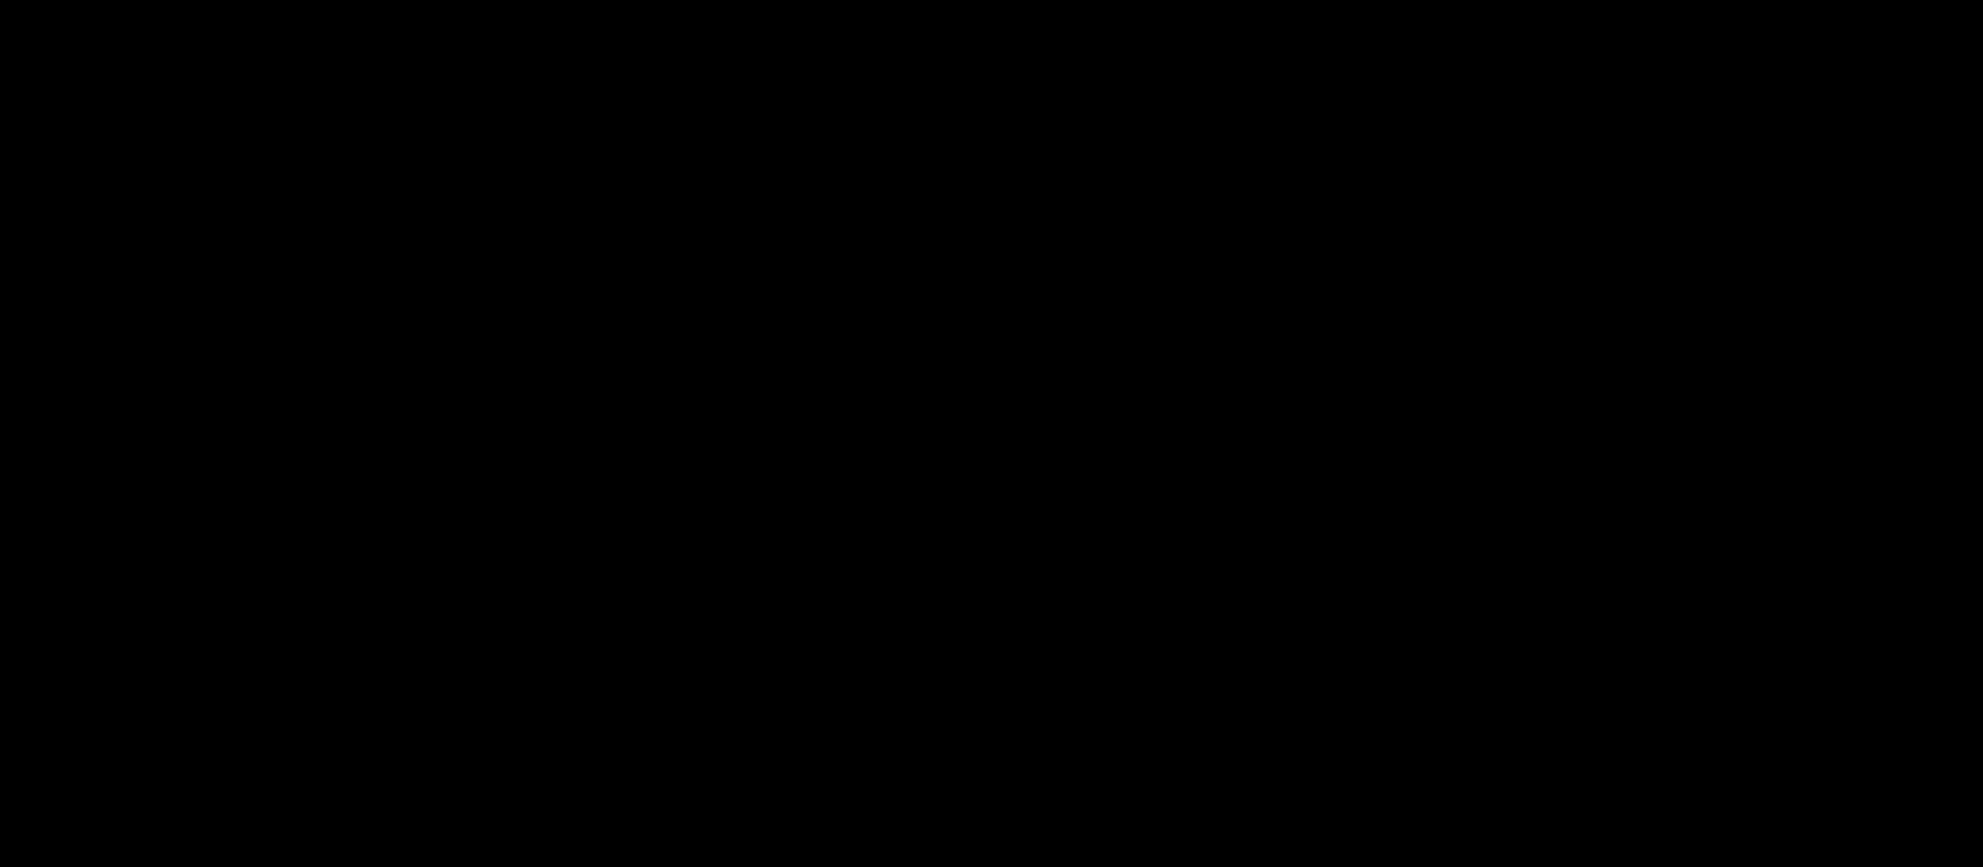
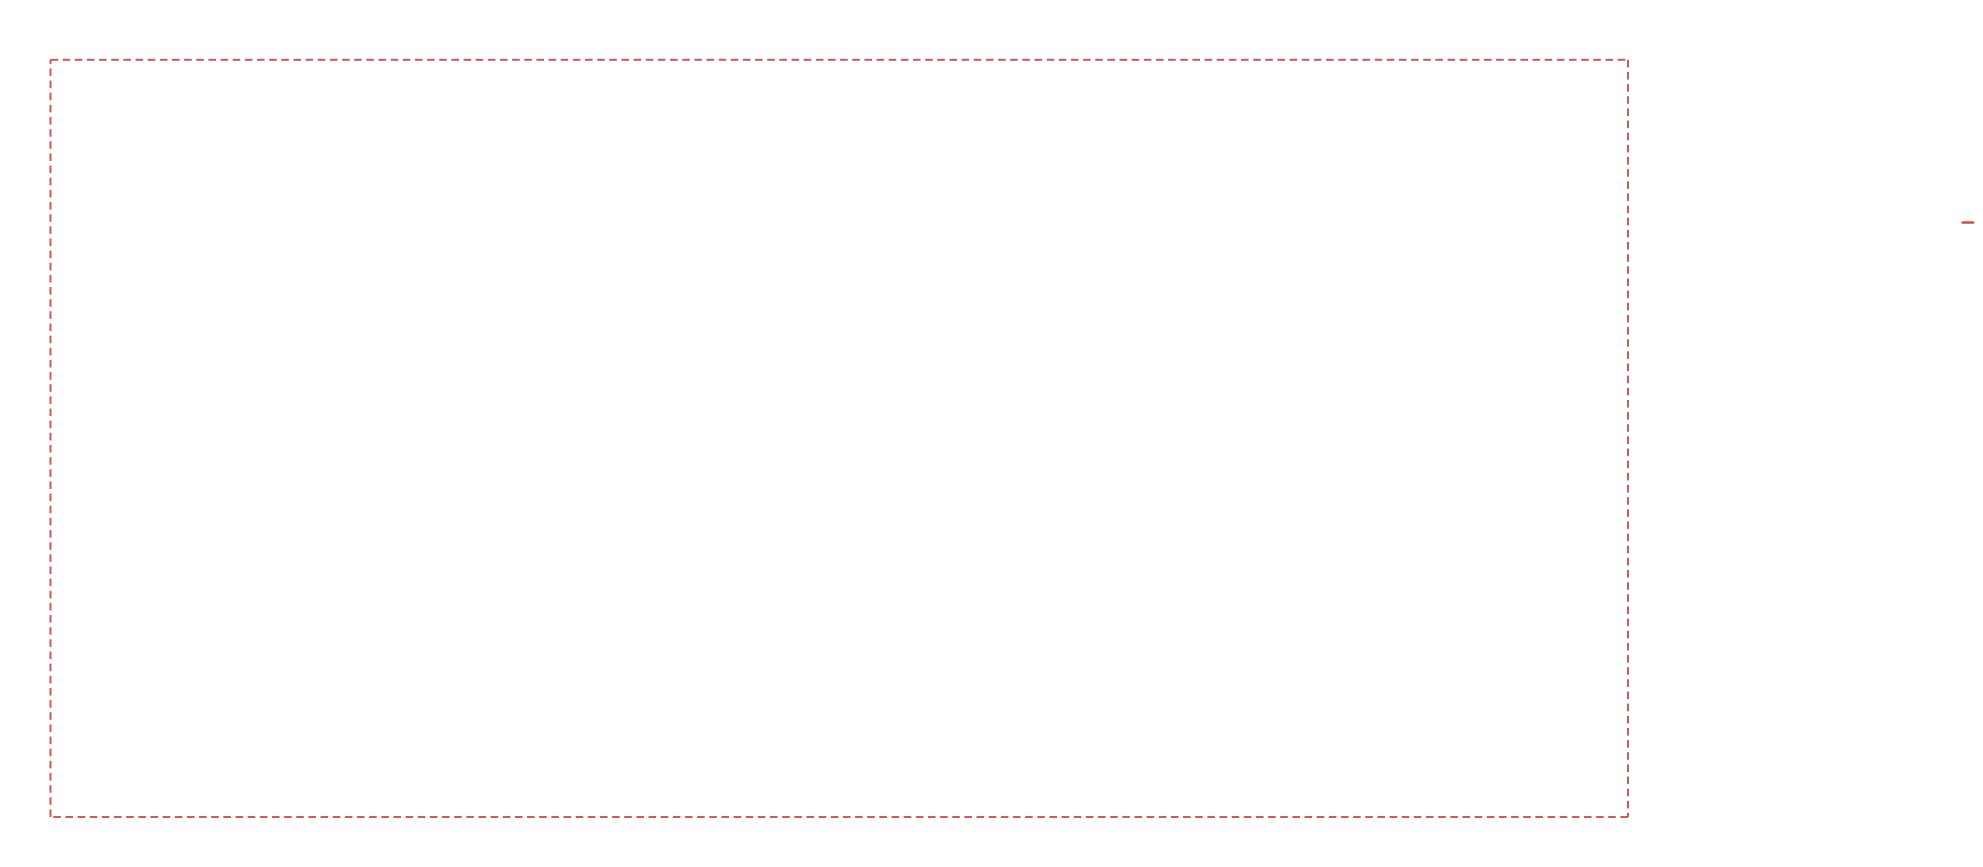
zone outline: none -> (50, 59) (1627, 59) (1627, 817) (50, 817) (50, 59)
track: none -> (1962, 222) (1973, 222)

